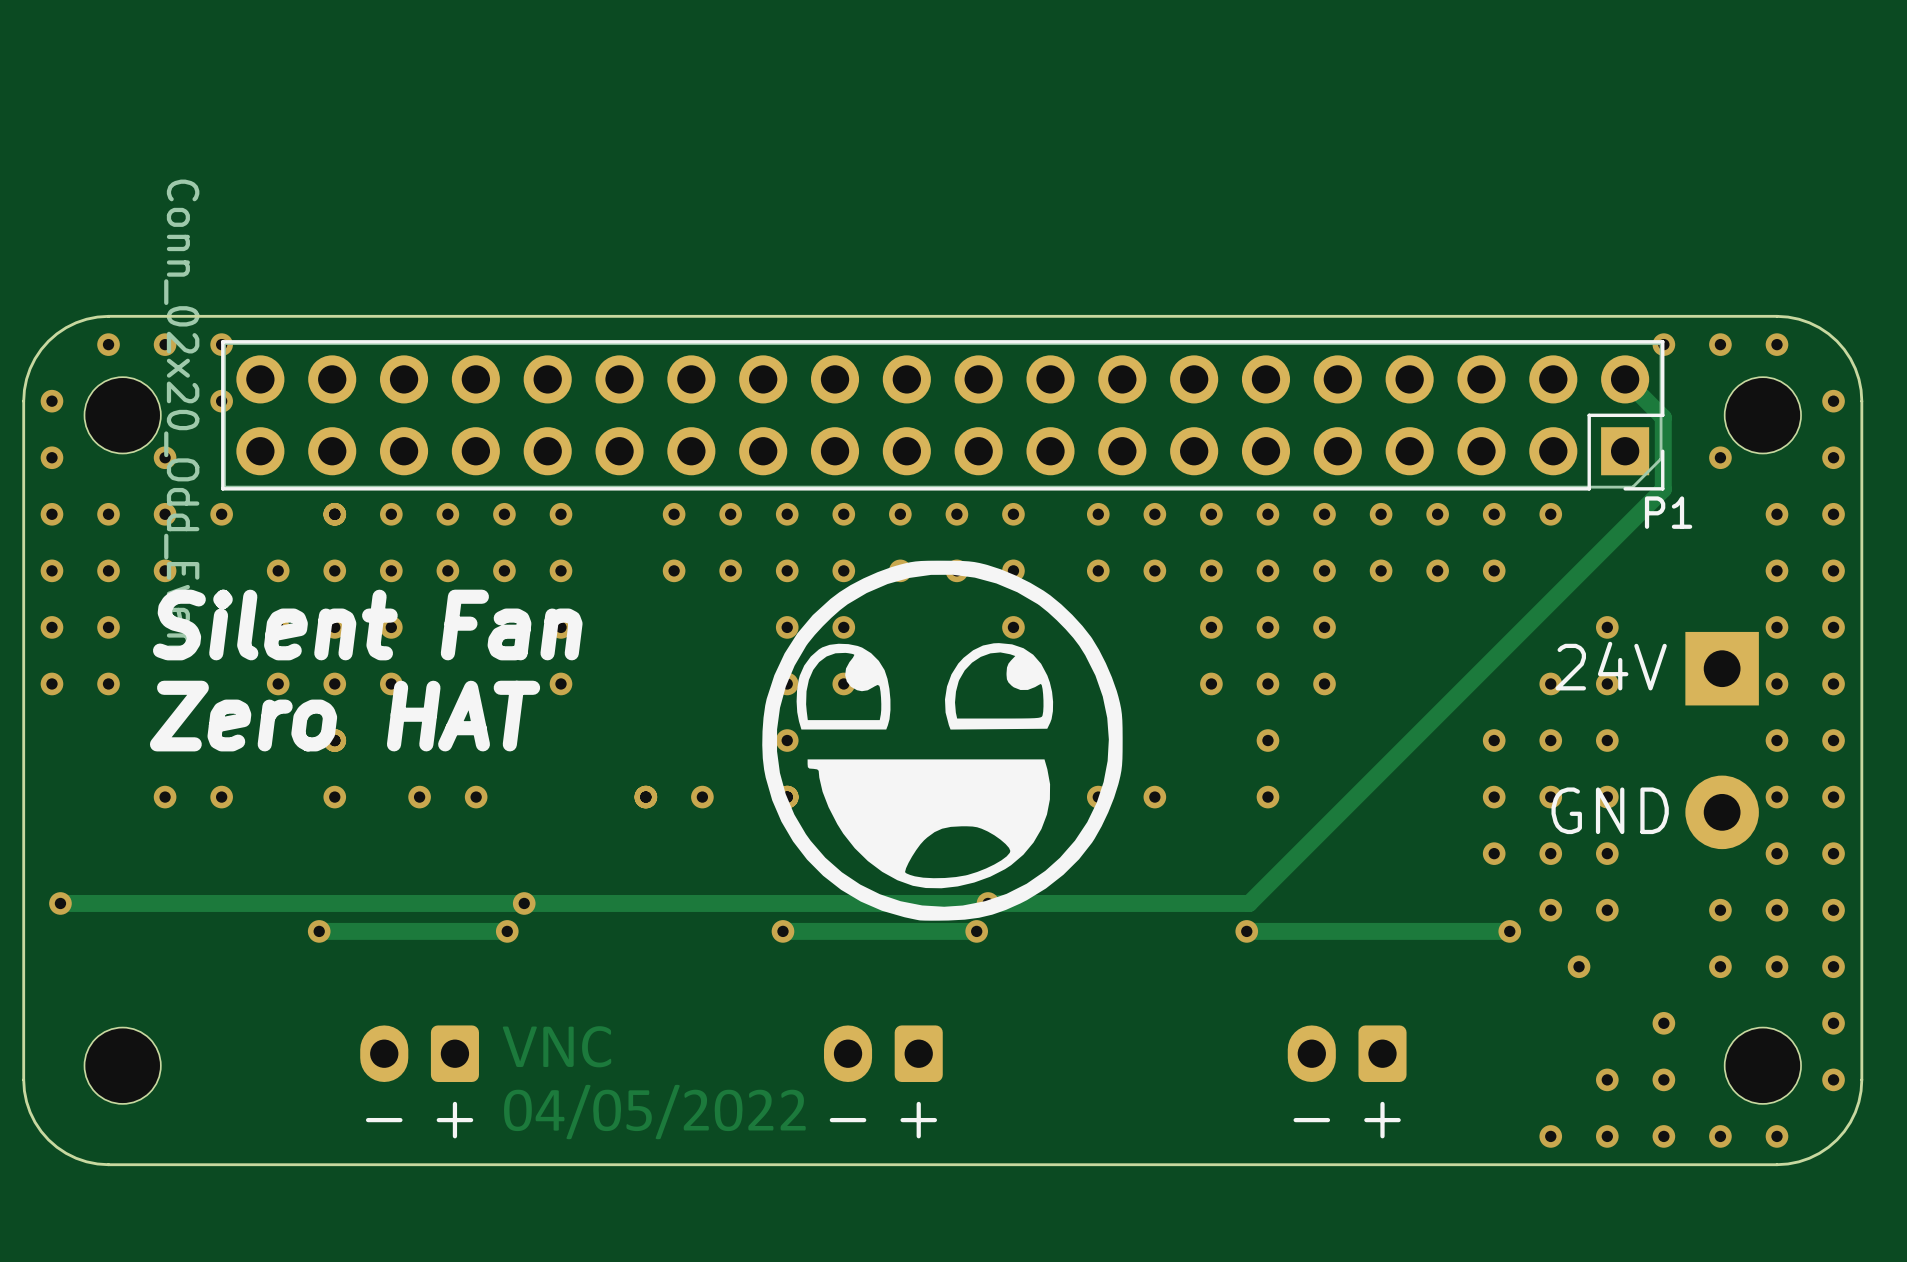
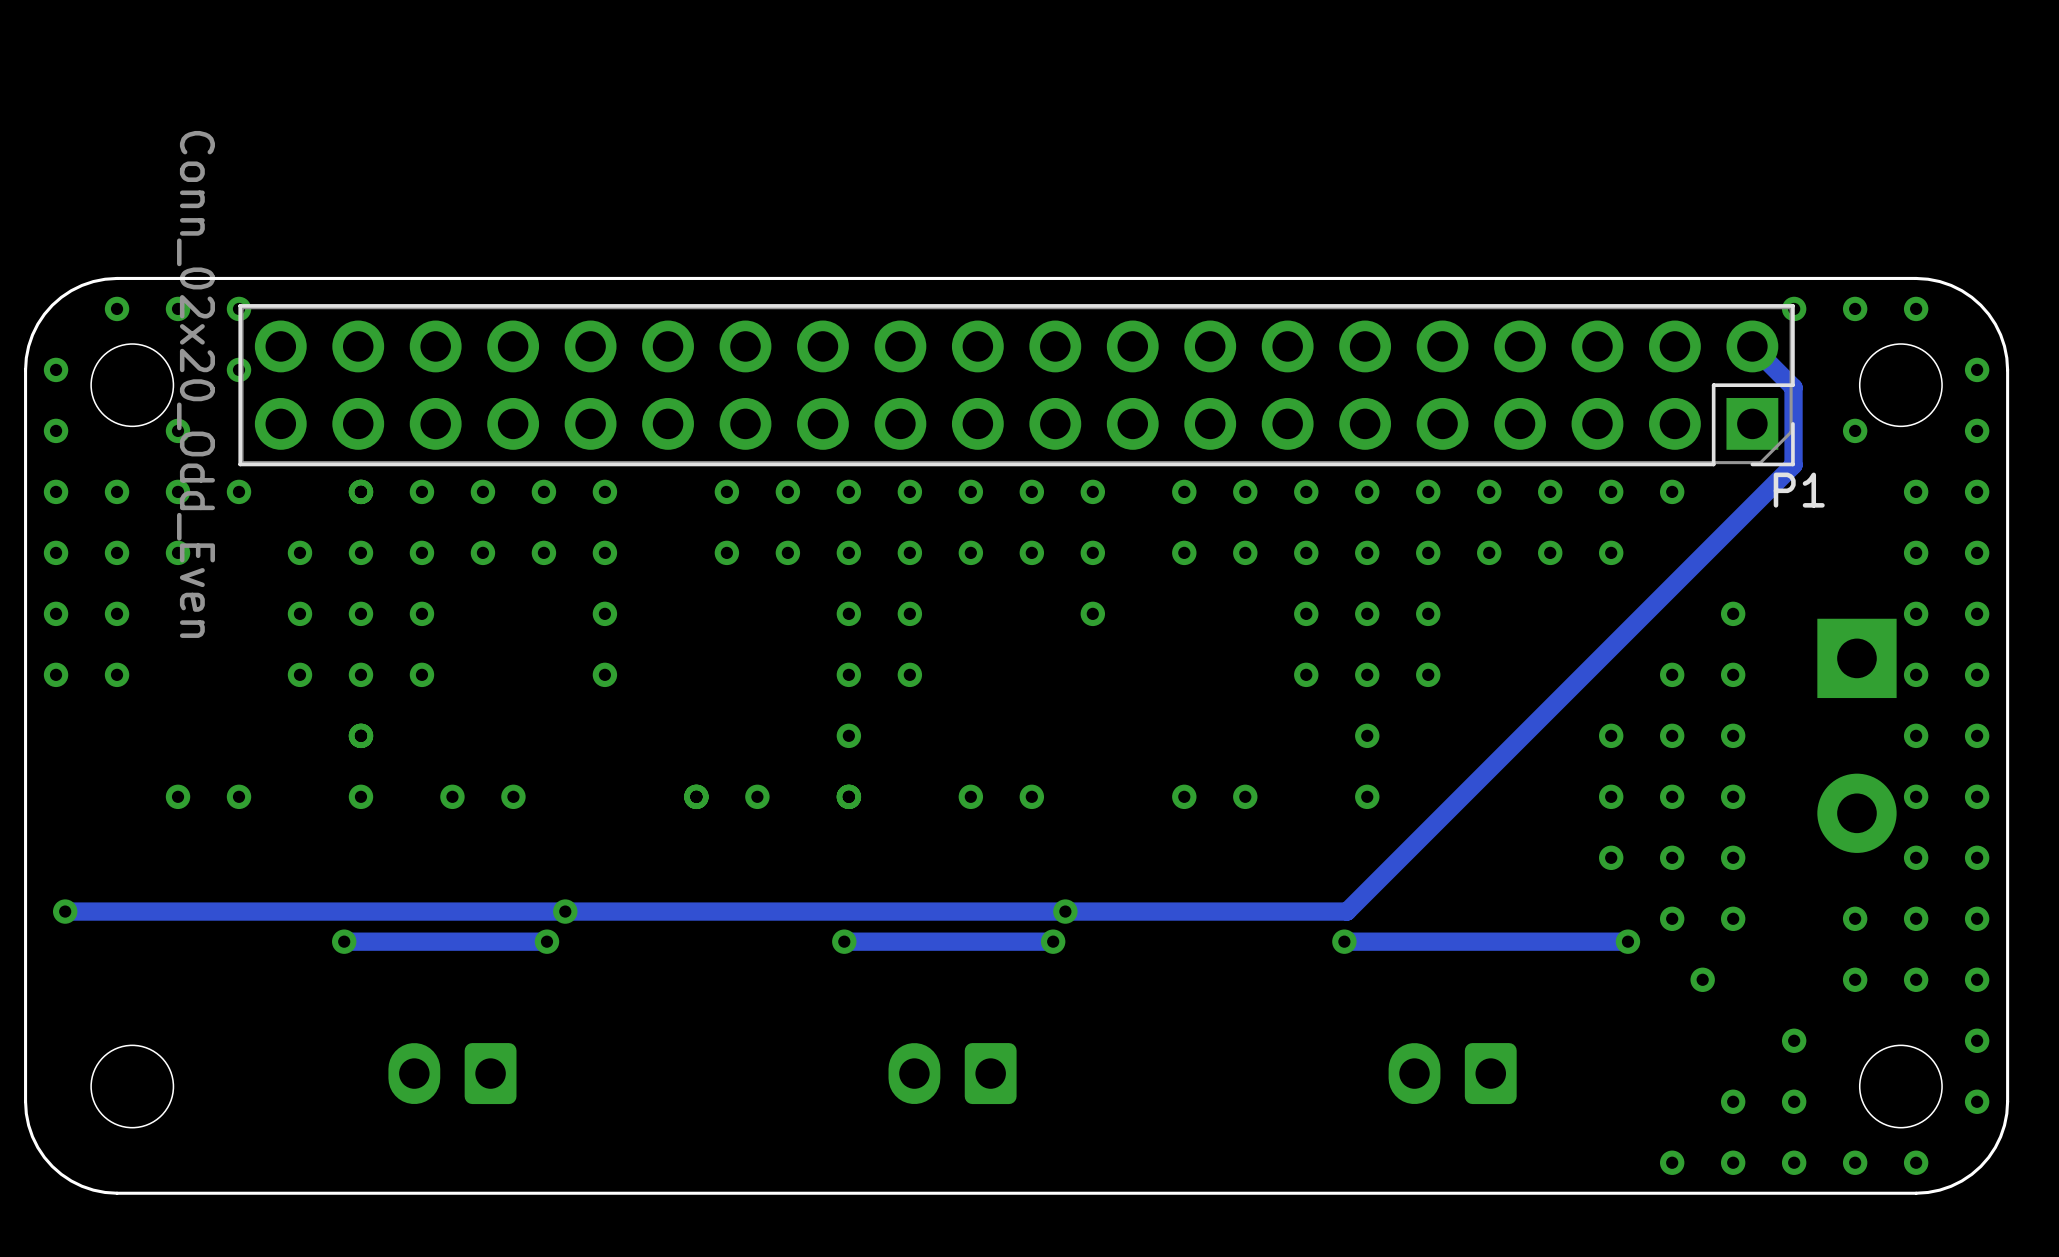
drawing: [762, 560, 1123, 921] -> none
text: Silent Fan (367, 625) -> none
text: 24V (1611, 666) -> none
text: Zero HAT (345, 716) -> none
text: GND (1610, 810) -> none
drawing: [502, 1026, 806, 1140] -> none
text: - (384, 1120) -> none
text: + (454, 1120) -> none
text: - (848, 1120) -> none
text: + (918, 1120) -> none
text: - (1311, 1120) -> none
text: + (1382, 1120) -> none

